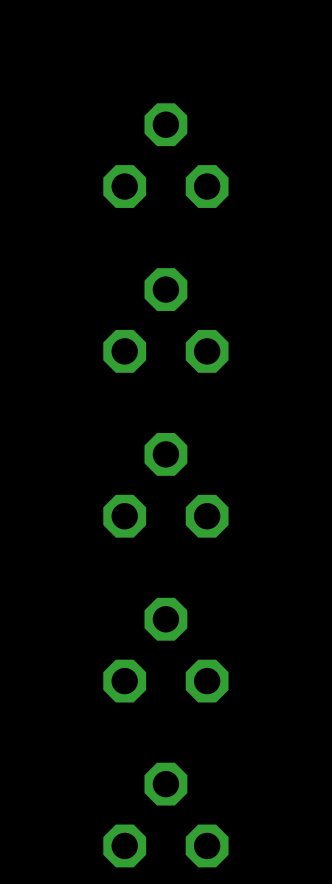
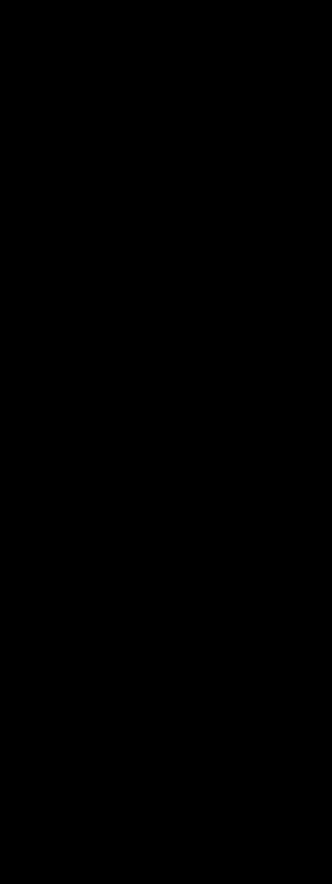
part: (165, 155) -> none
part: (165, 320) -> none
part: (165, 485) -> none
part: (165, 650) -> none
part: (165, 815) -> none

